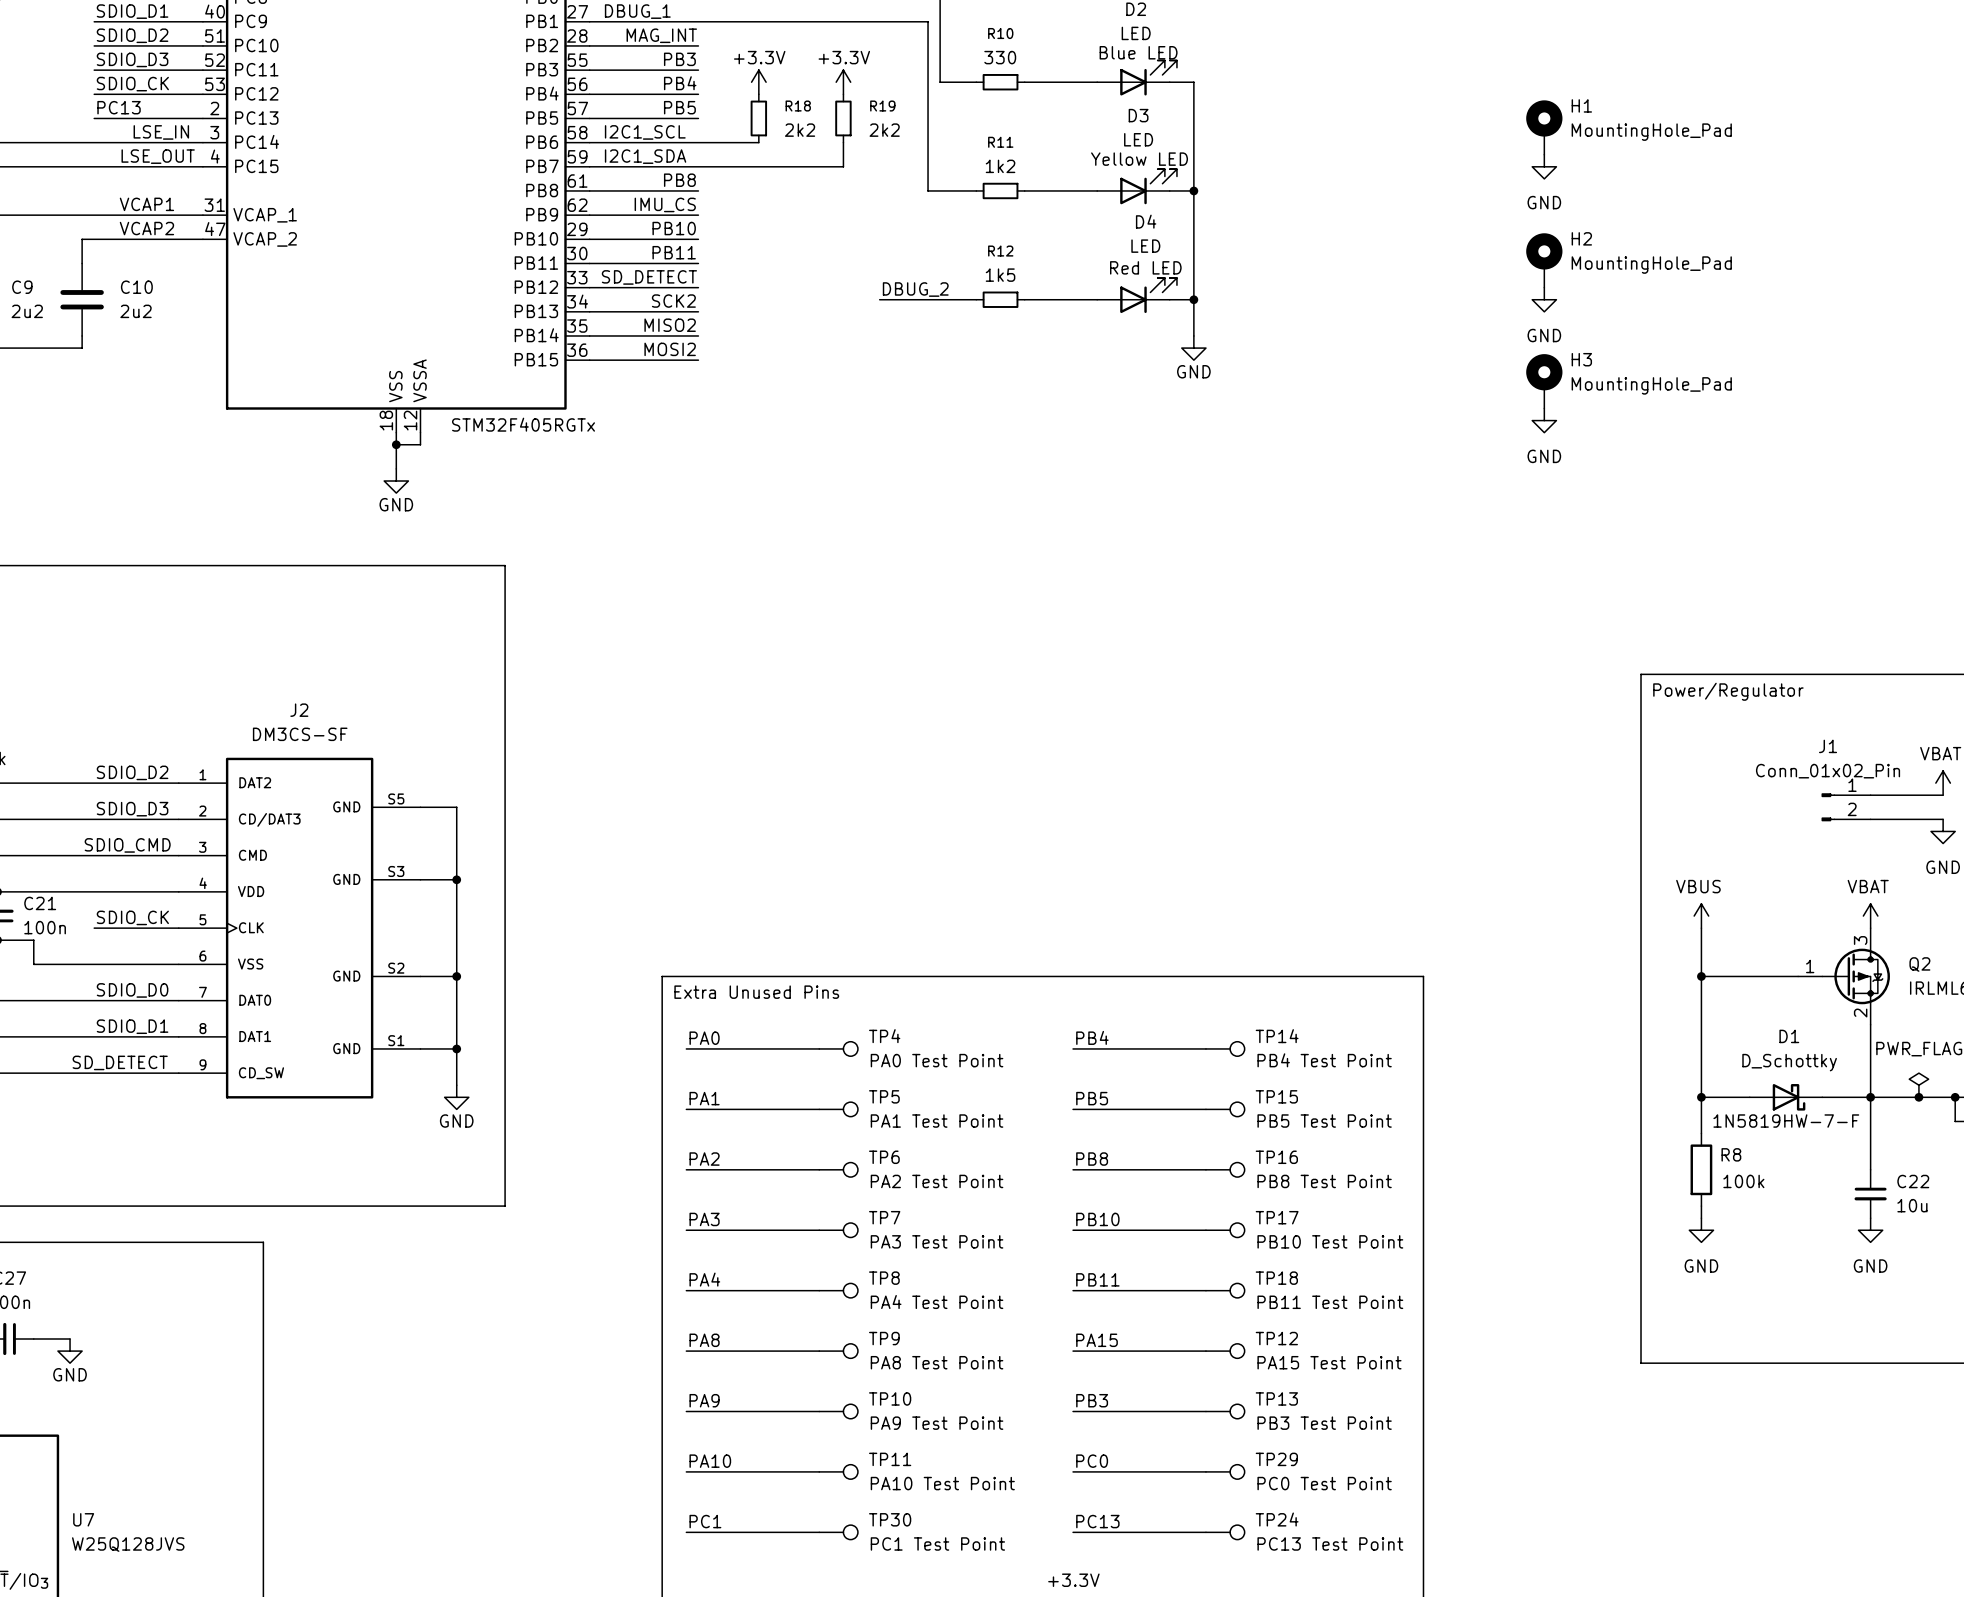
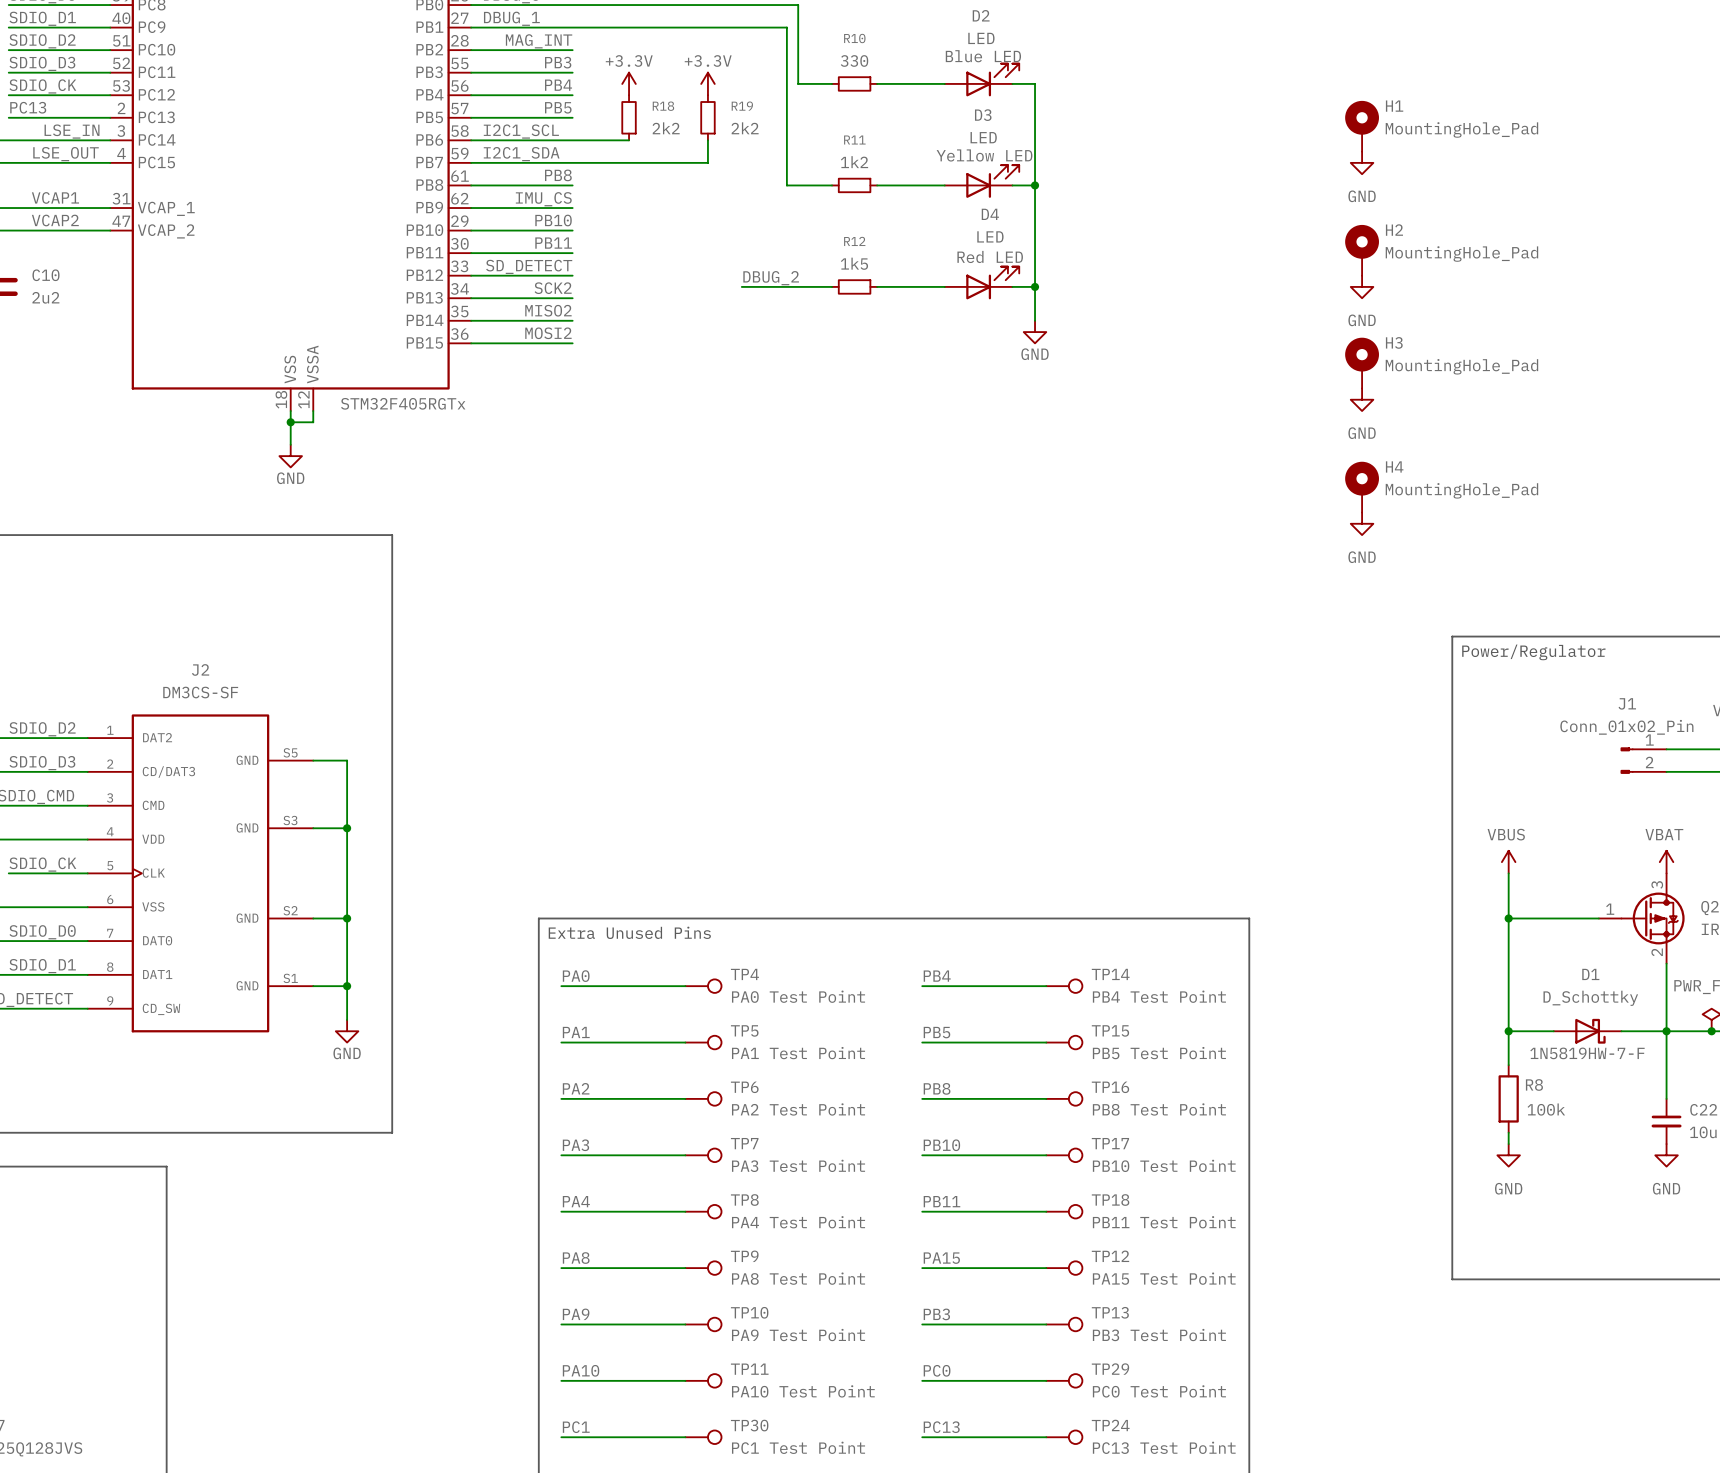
H4: none -> MountingHole_Pad (1362, 487)
power symbol: none -> GND (1362, 523)

